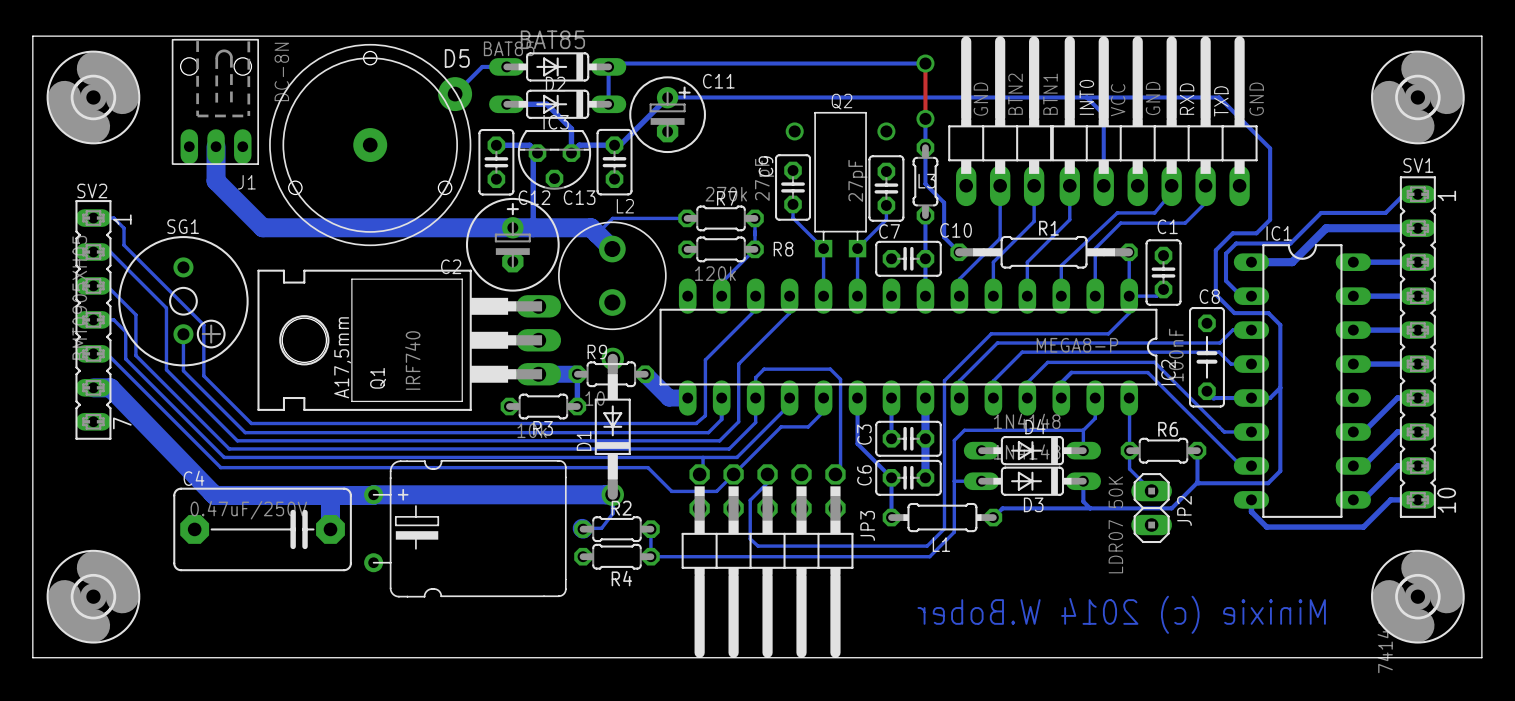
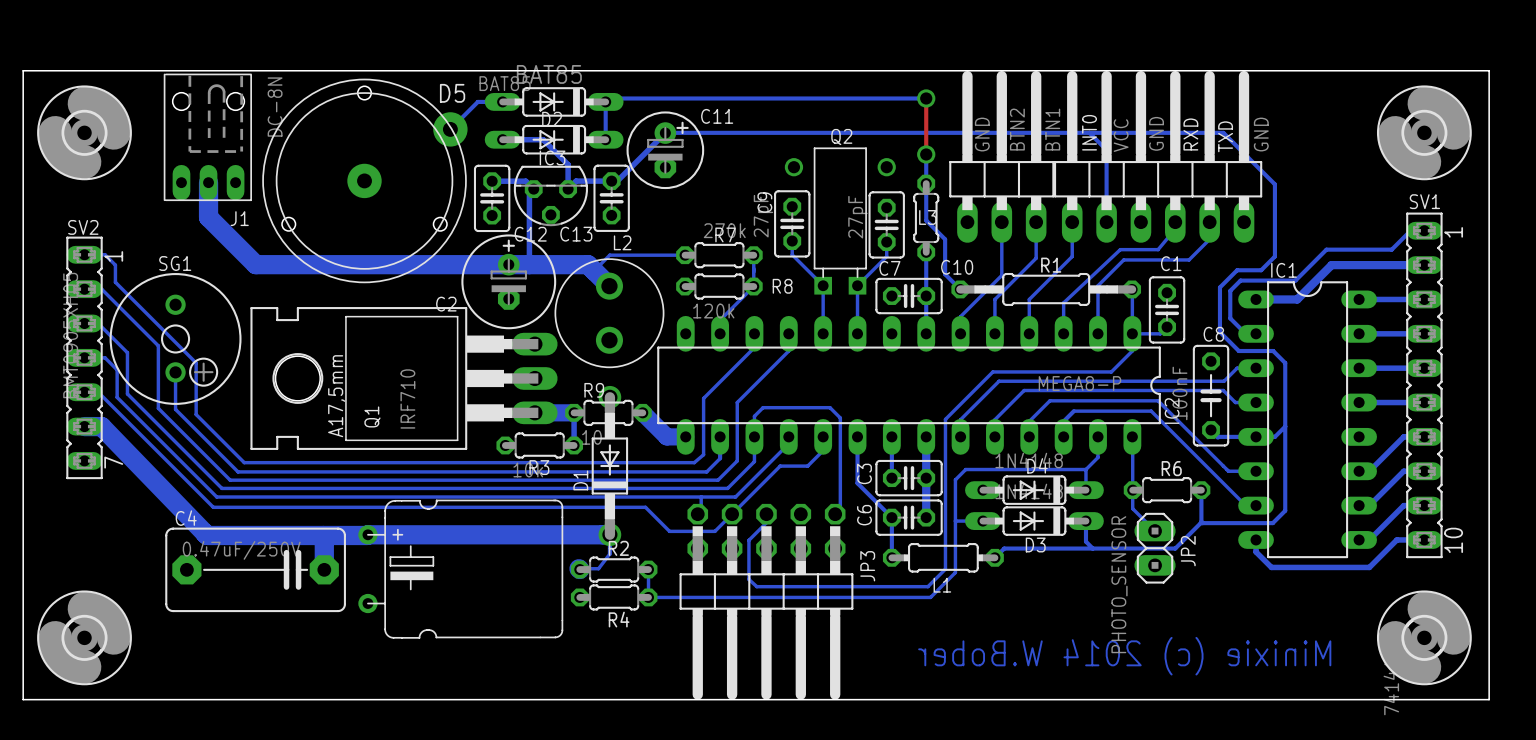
Q1 value: IRF740 (412, 360) -> IRF710 (407, 398)
JP2 value: LDR07 50K (1115, 524) -> PHOTO_SENSOR (1119, 584)

